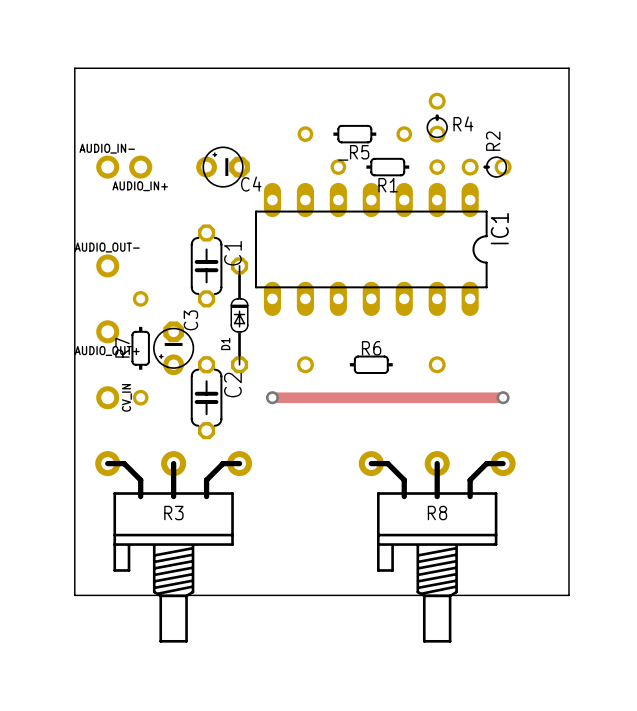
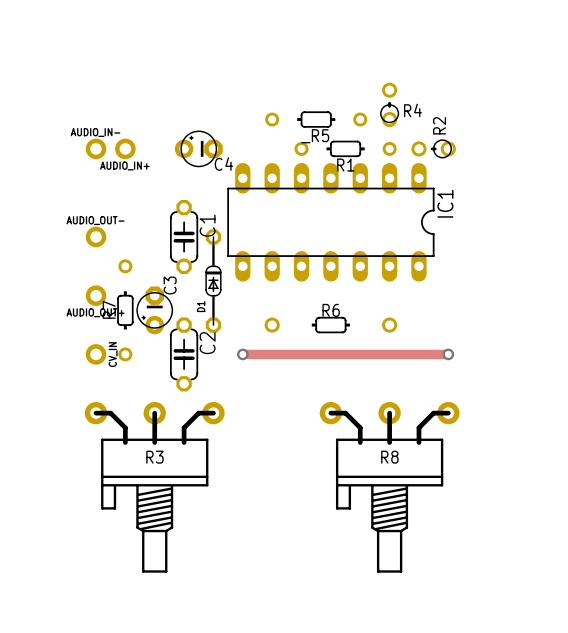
board edge: (74, 68) (568, 68) (568, 595) (74, 595) (74, 68) -> none

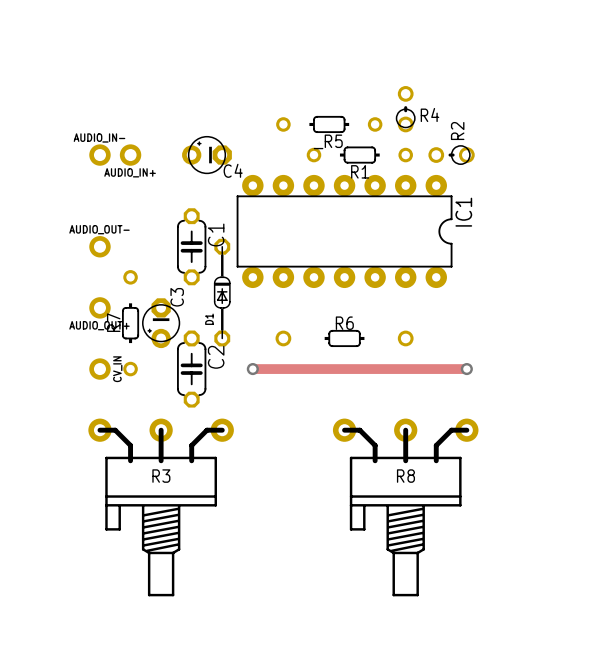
IC1 footprint: [227, 162, 435, 282] -> [236, 174, 453, 289]

